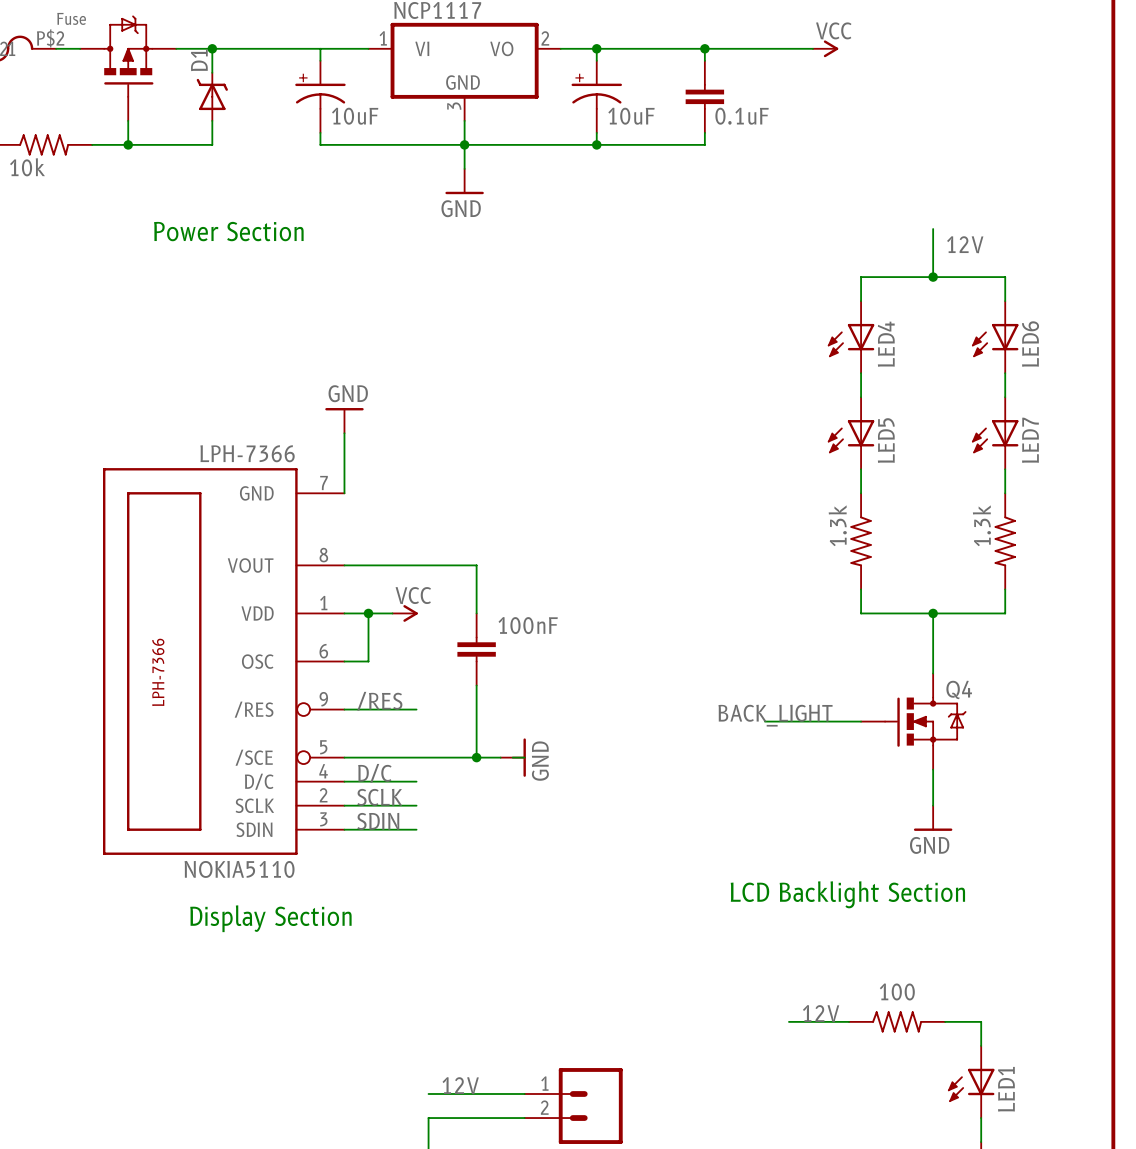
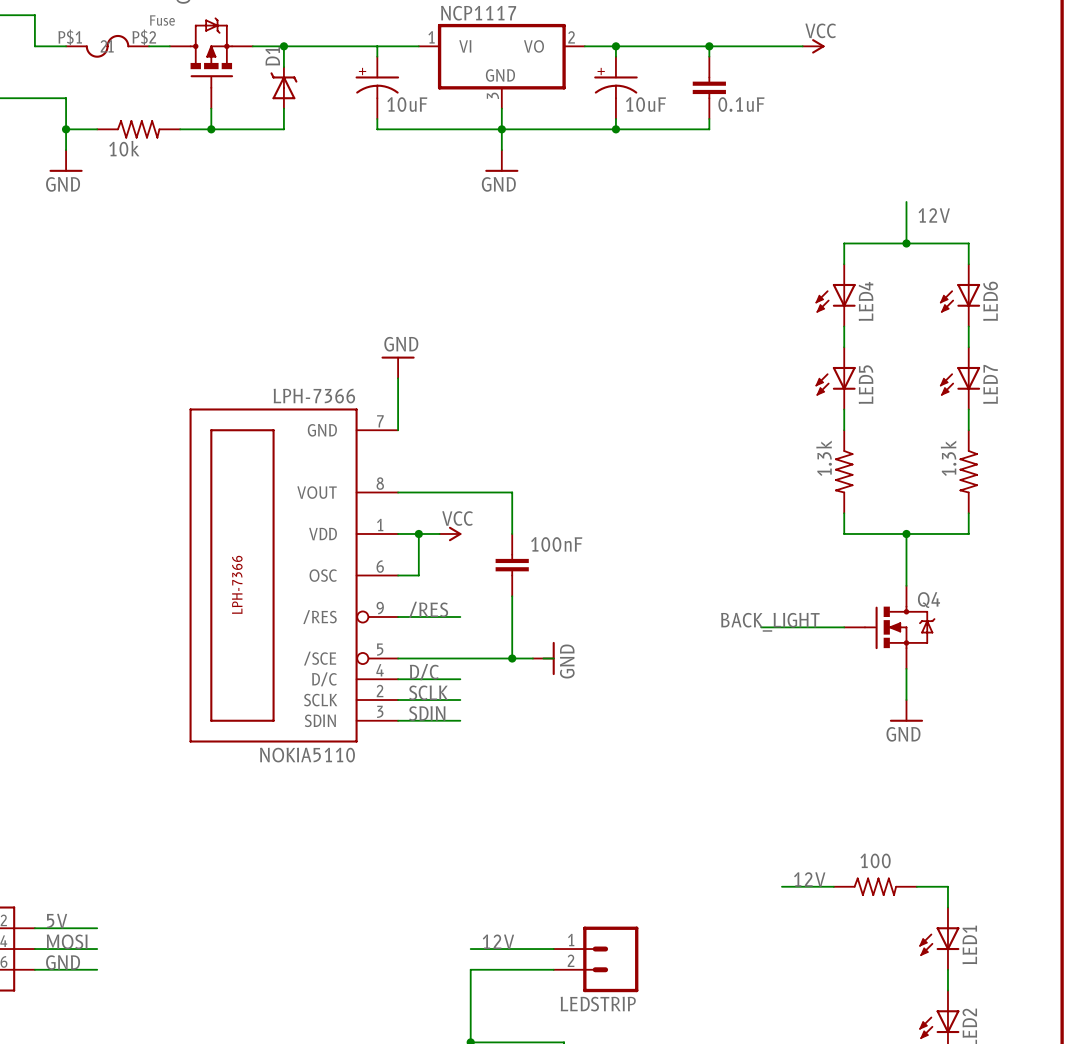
text: Power Section (228, 231) -> none
text: LCD Backlight Section (847, 894) -> none
text: Display Section (270, 918) -> none

